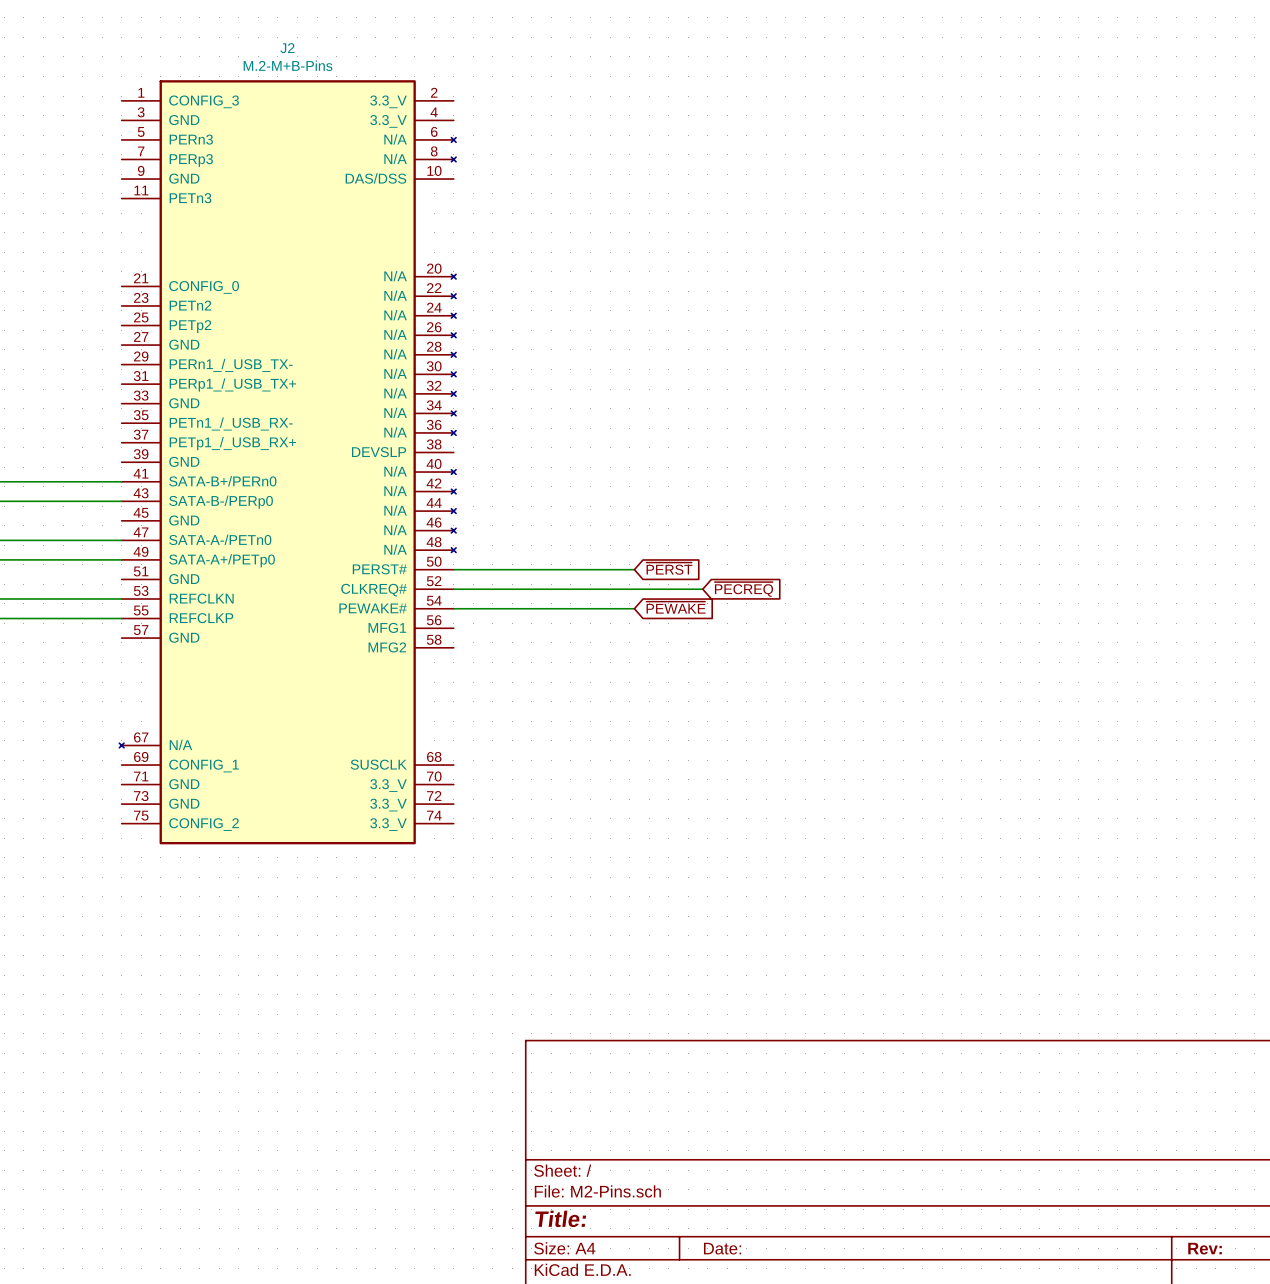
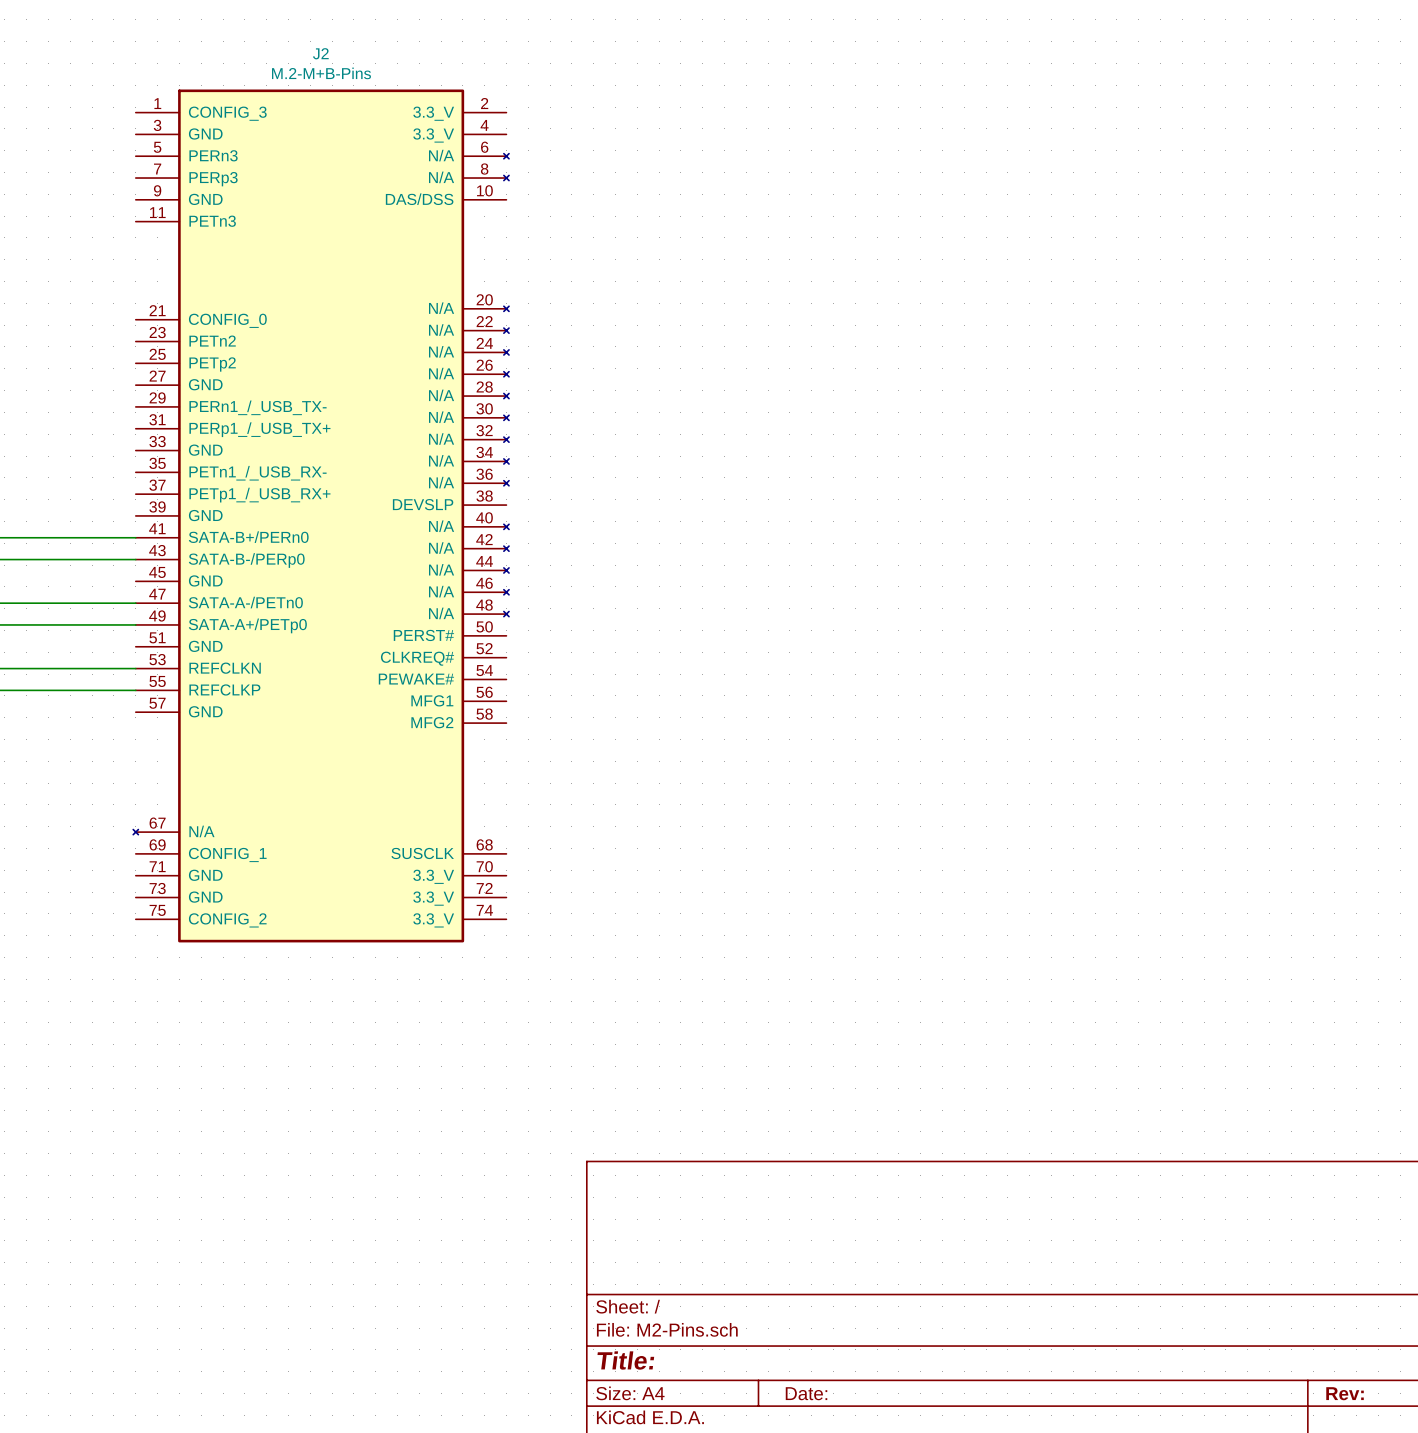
global label: ~{PERST} (669, 568) -> none
wire: (453, 569) (634, 569) -> none
wire: (453, 589) (702, 589) -> none
global label: ~{PECREQ} (743, 589) -> none
global label: ~{PEWAKE} (675, 607) -> none
wire: (453, 608) (634, 608) -> none

